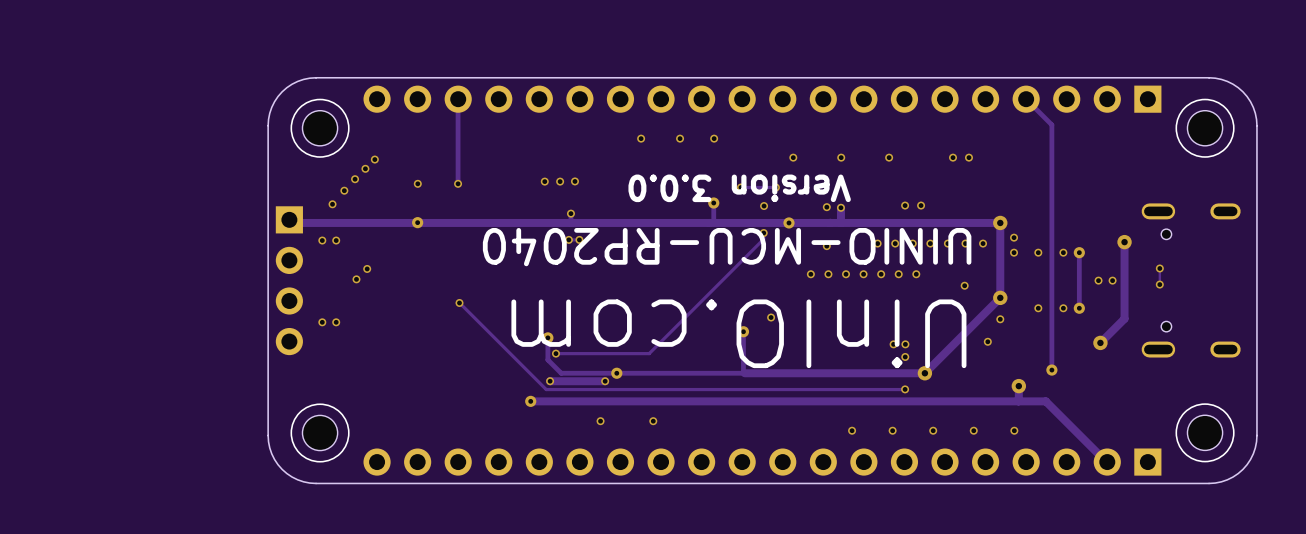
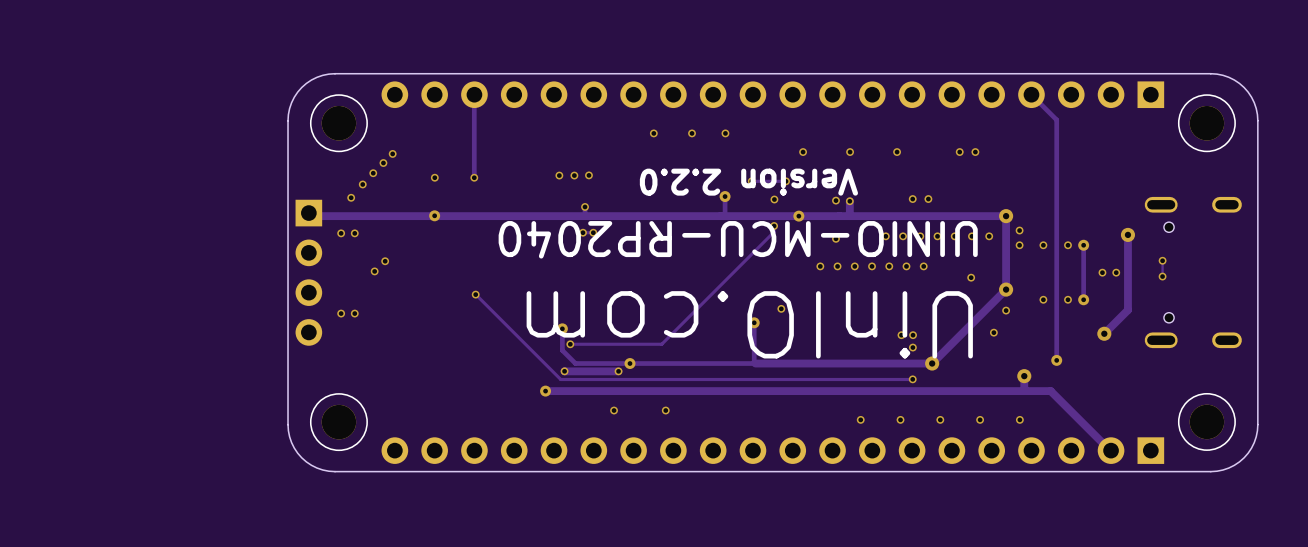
part footprint: [290, 98, 350, 158] -> [309, 94, 368, 153]
part footprint: [1175, 98, 1235, 158] -> [1177, 94, 1236, 153]
text: Version 3.0.0 (739, 188) -> Version 2.2.0 (748, 182)
part footprint: [290, 403, 350, 463] -> [309, 393, 368, 452]
part footprint: [1175, 403, 1235, 463] -> [1177, 392, 1236, 451]

